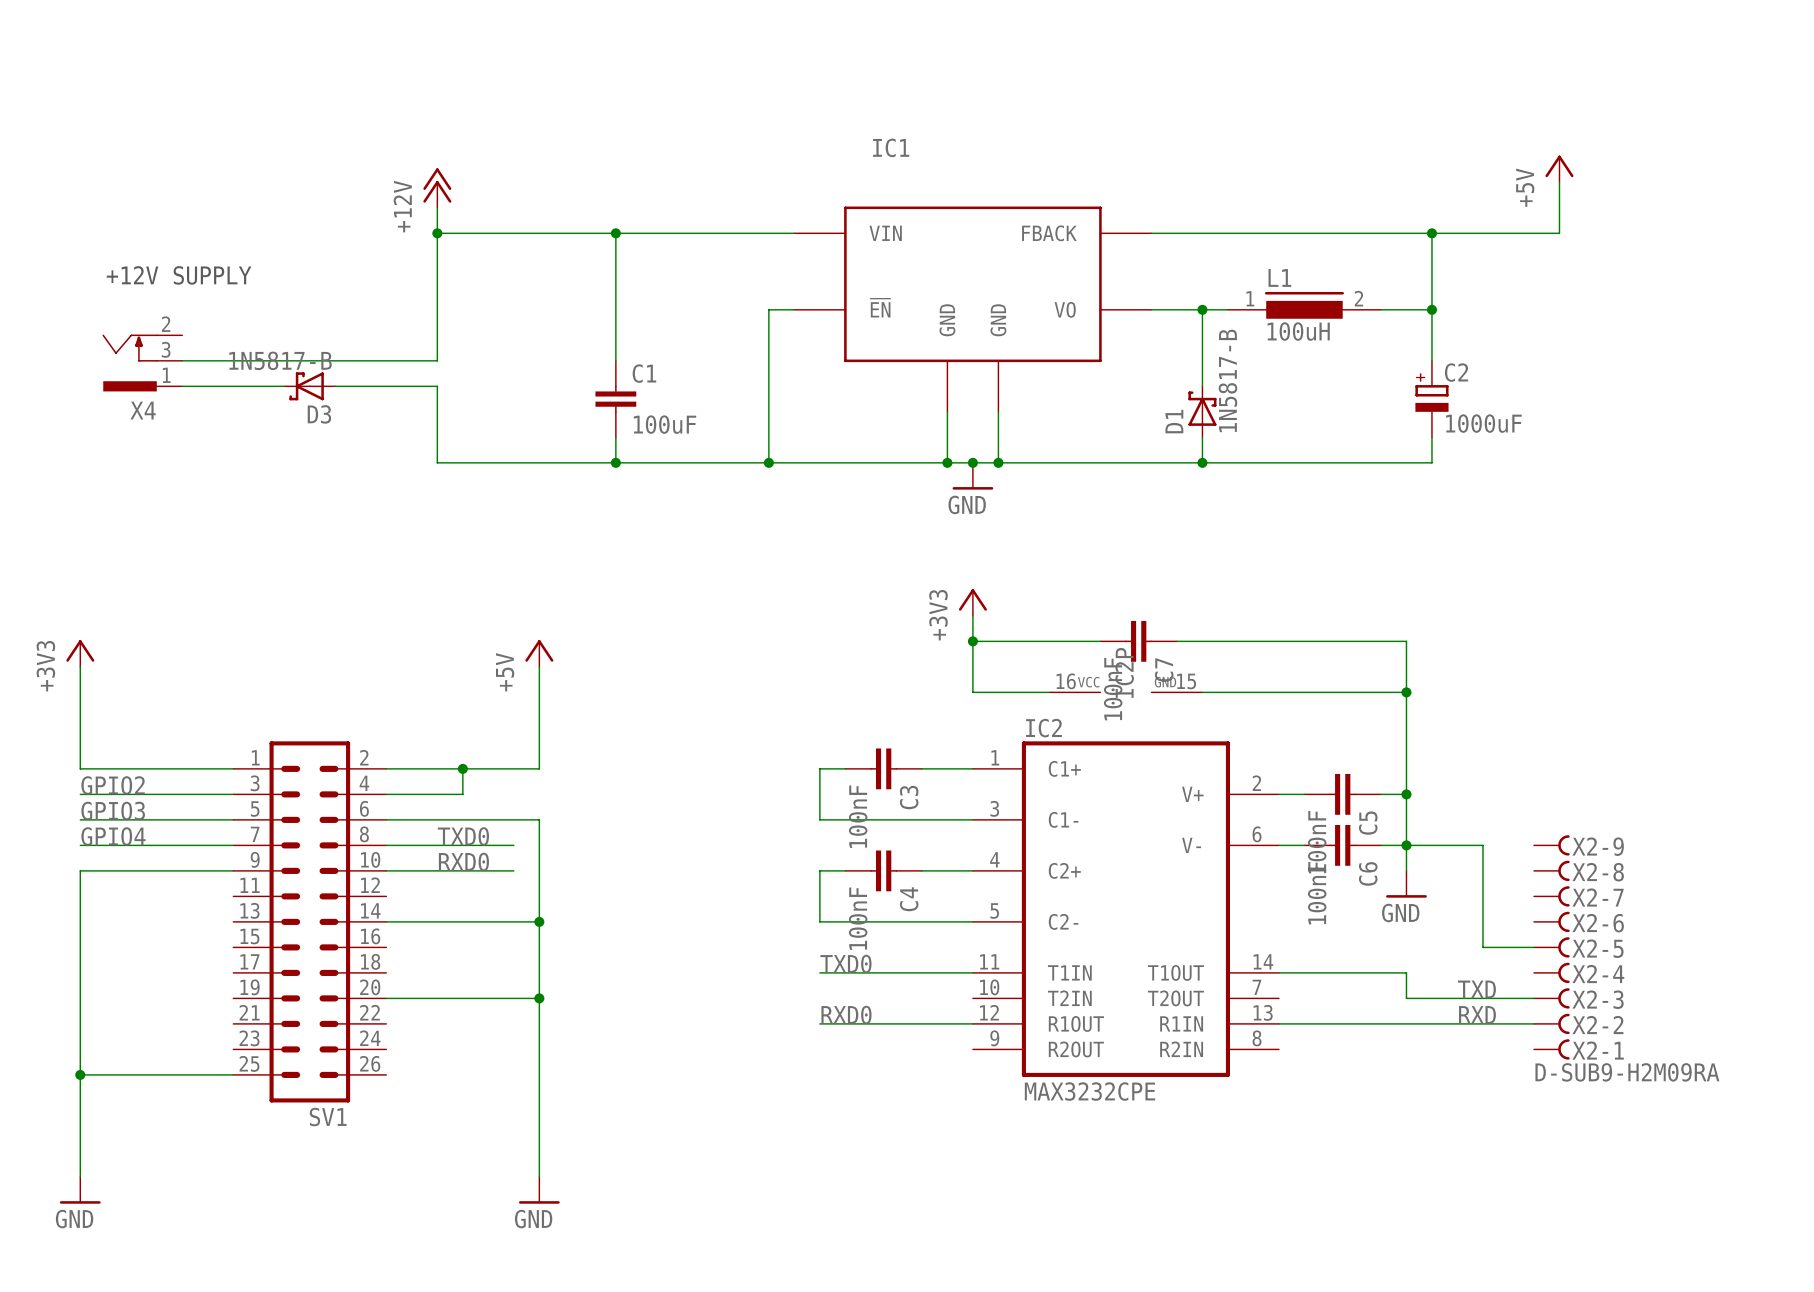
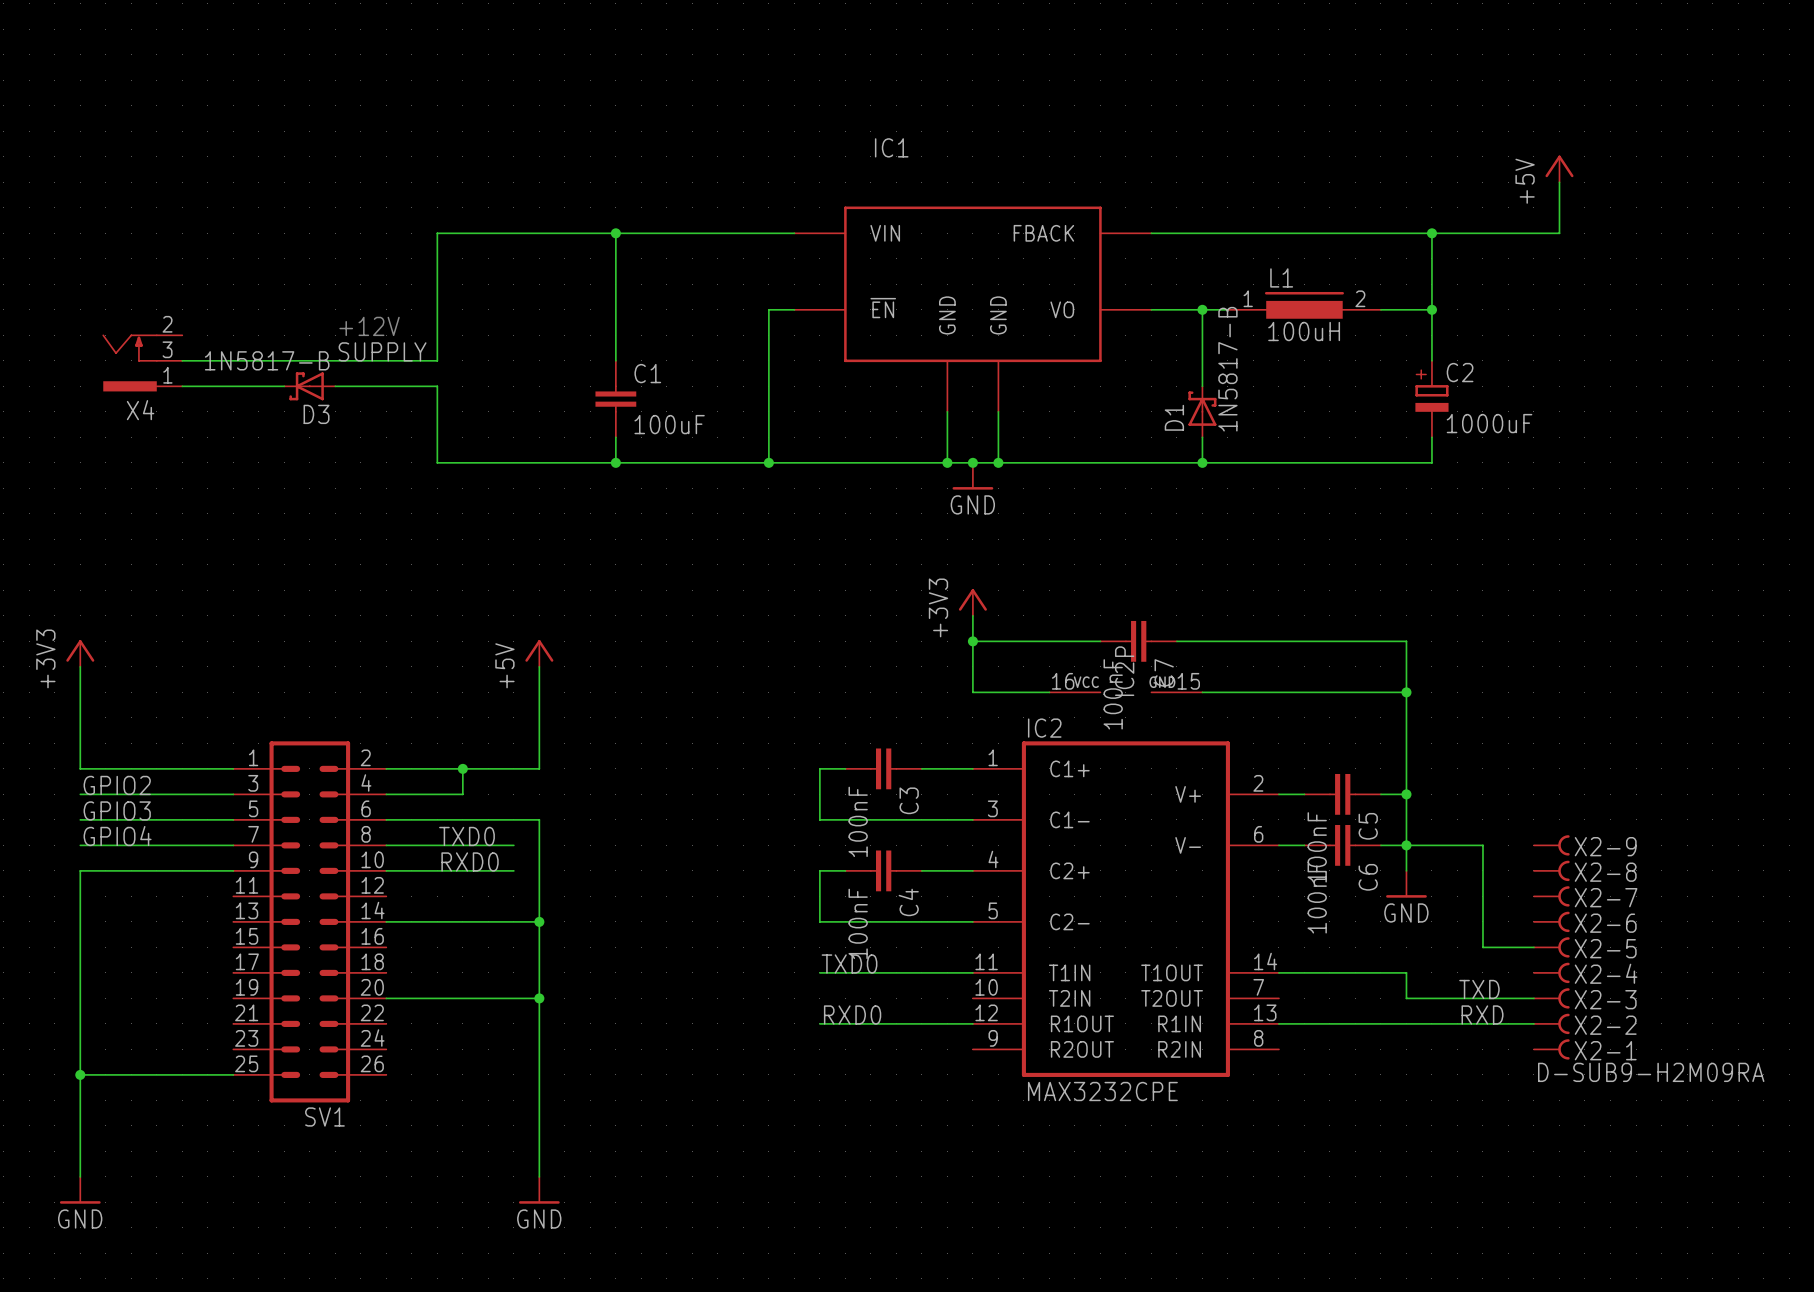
power symbol: +12V (437, 188) -> none
wire: (437, 207) (437, 233) -> none
junction: (437, 233) -> none
text: +12V SUPPLY (179, 275) -> none
text: none -> +12V (369, 326)
label: none -> SUPPLY (382, 351)

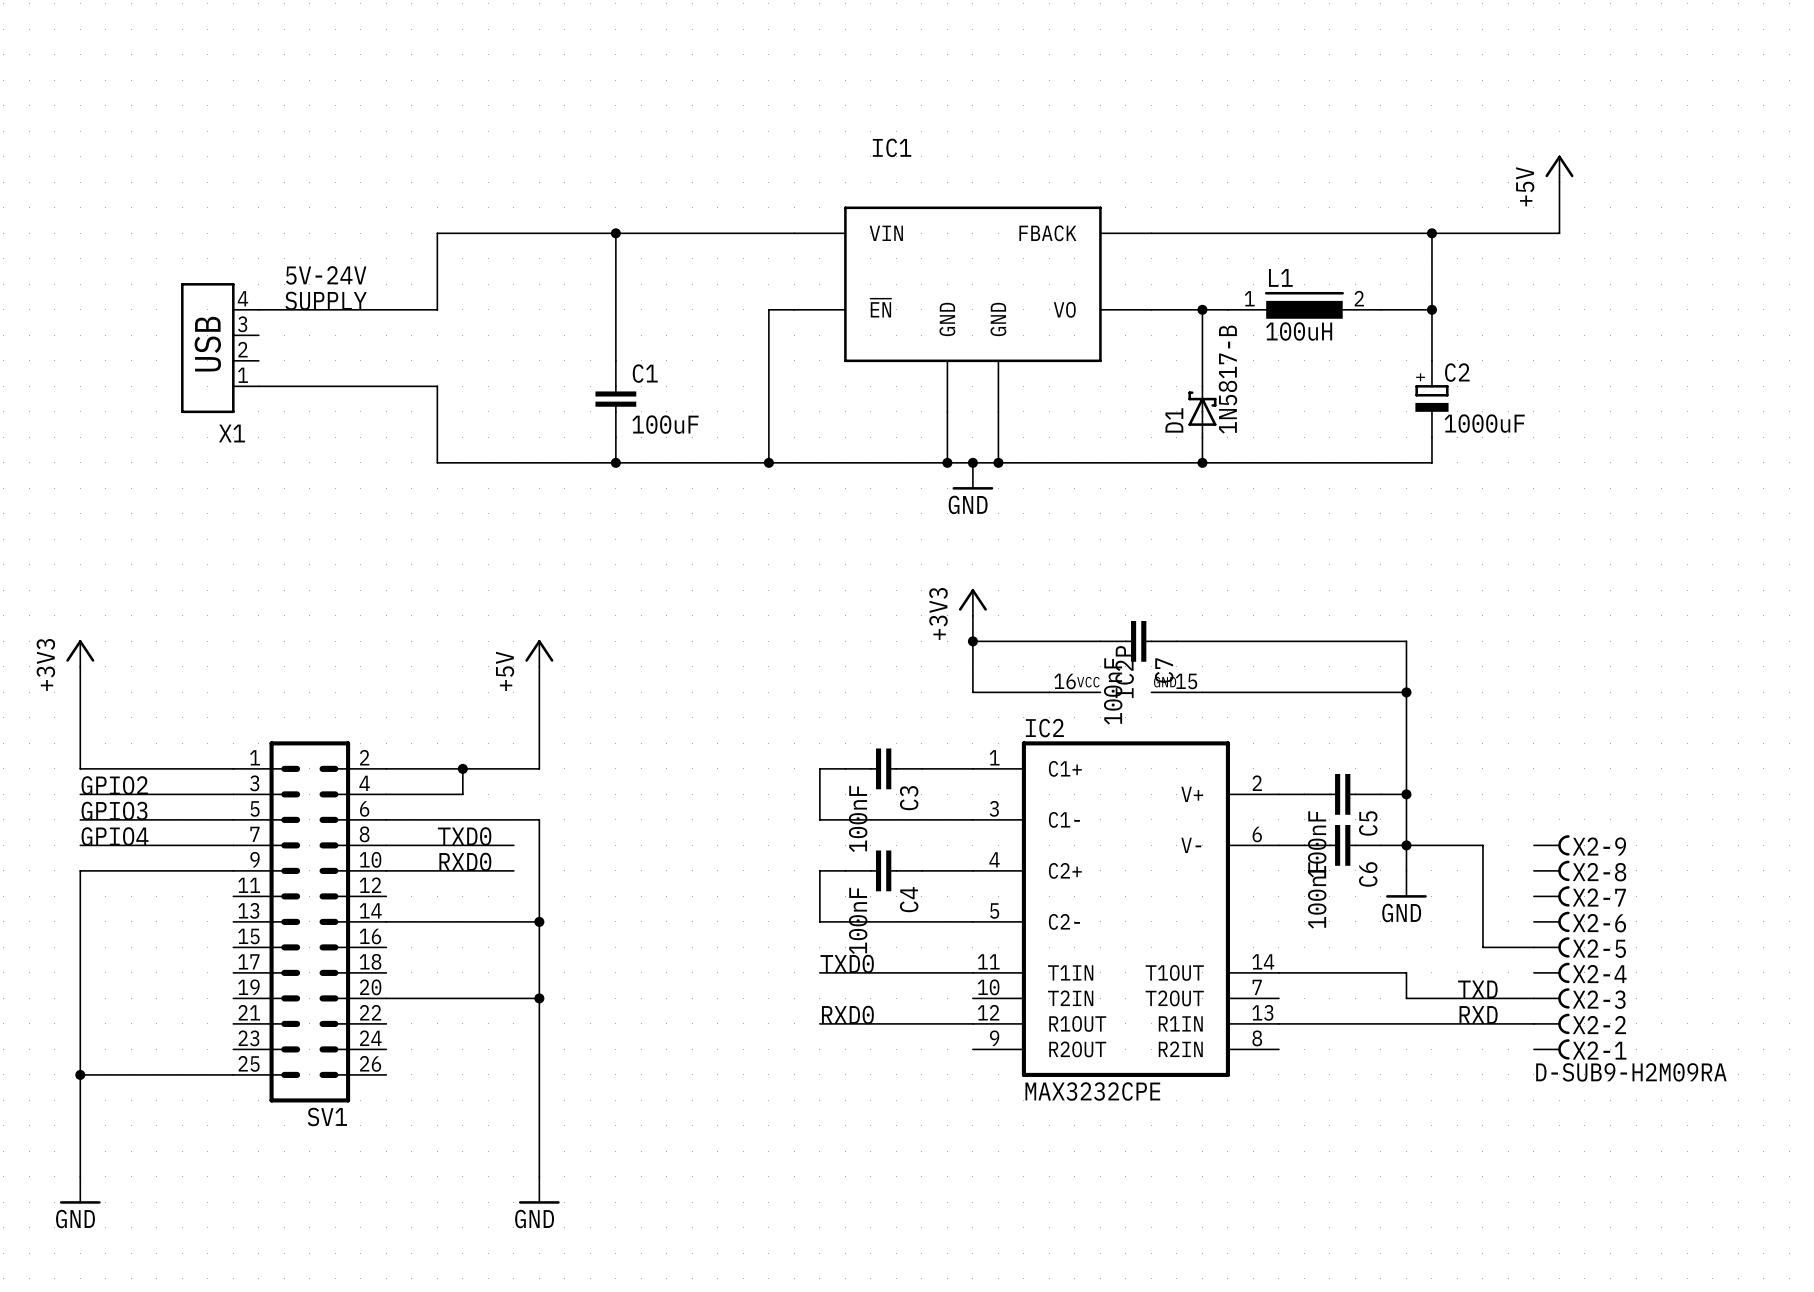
text: none -> 5V-24V (326, 275)
wire: (437, 309) (437, 360) (182, 360) -> (437, 309) (258, 309)
text: +12V (369, 326) -> none
X1: none -> (219, 348)
label position: SUPPLY (382, 351) -> SUPPLY (326, 300)
X4: (142, 363) -> none
wire: (182, 386) (258, 386) -> none
D3: 1N5817-B (309, 386) -> none

